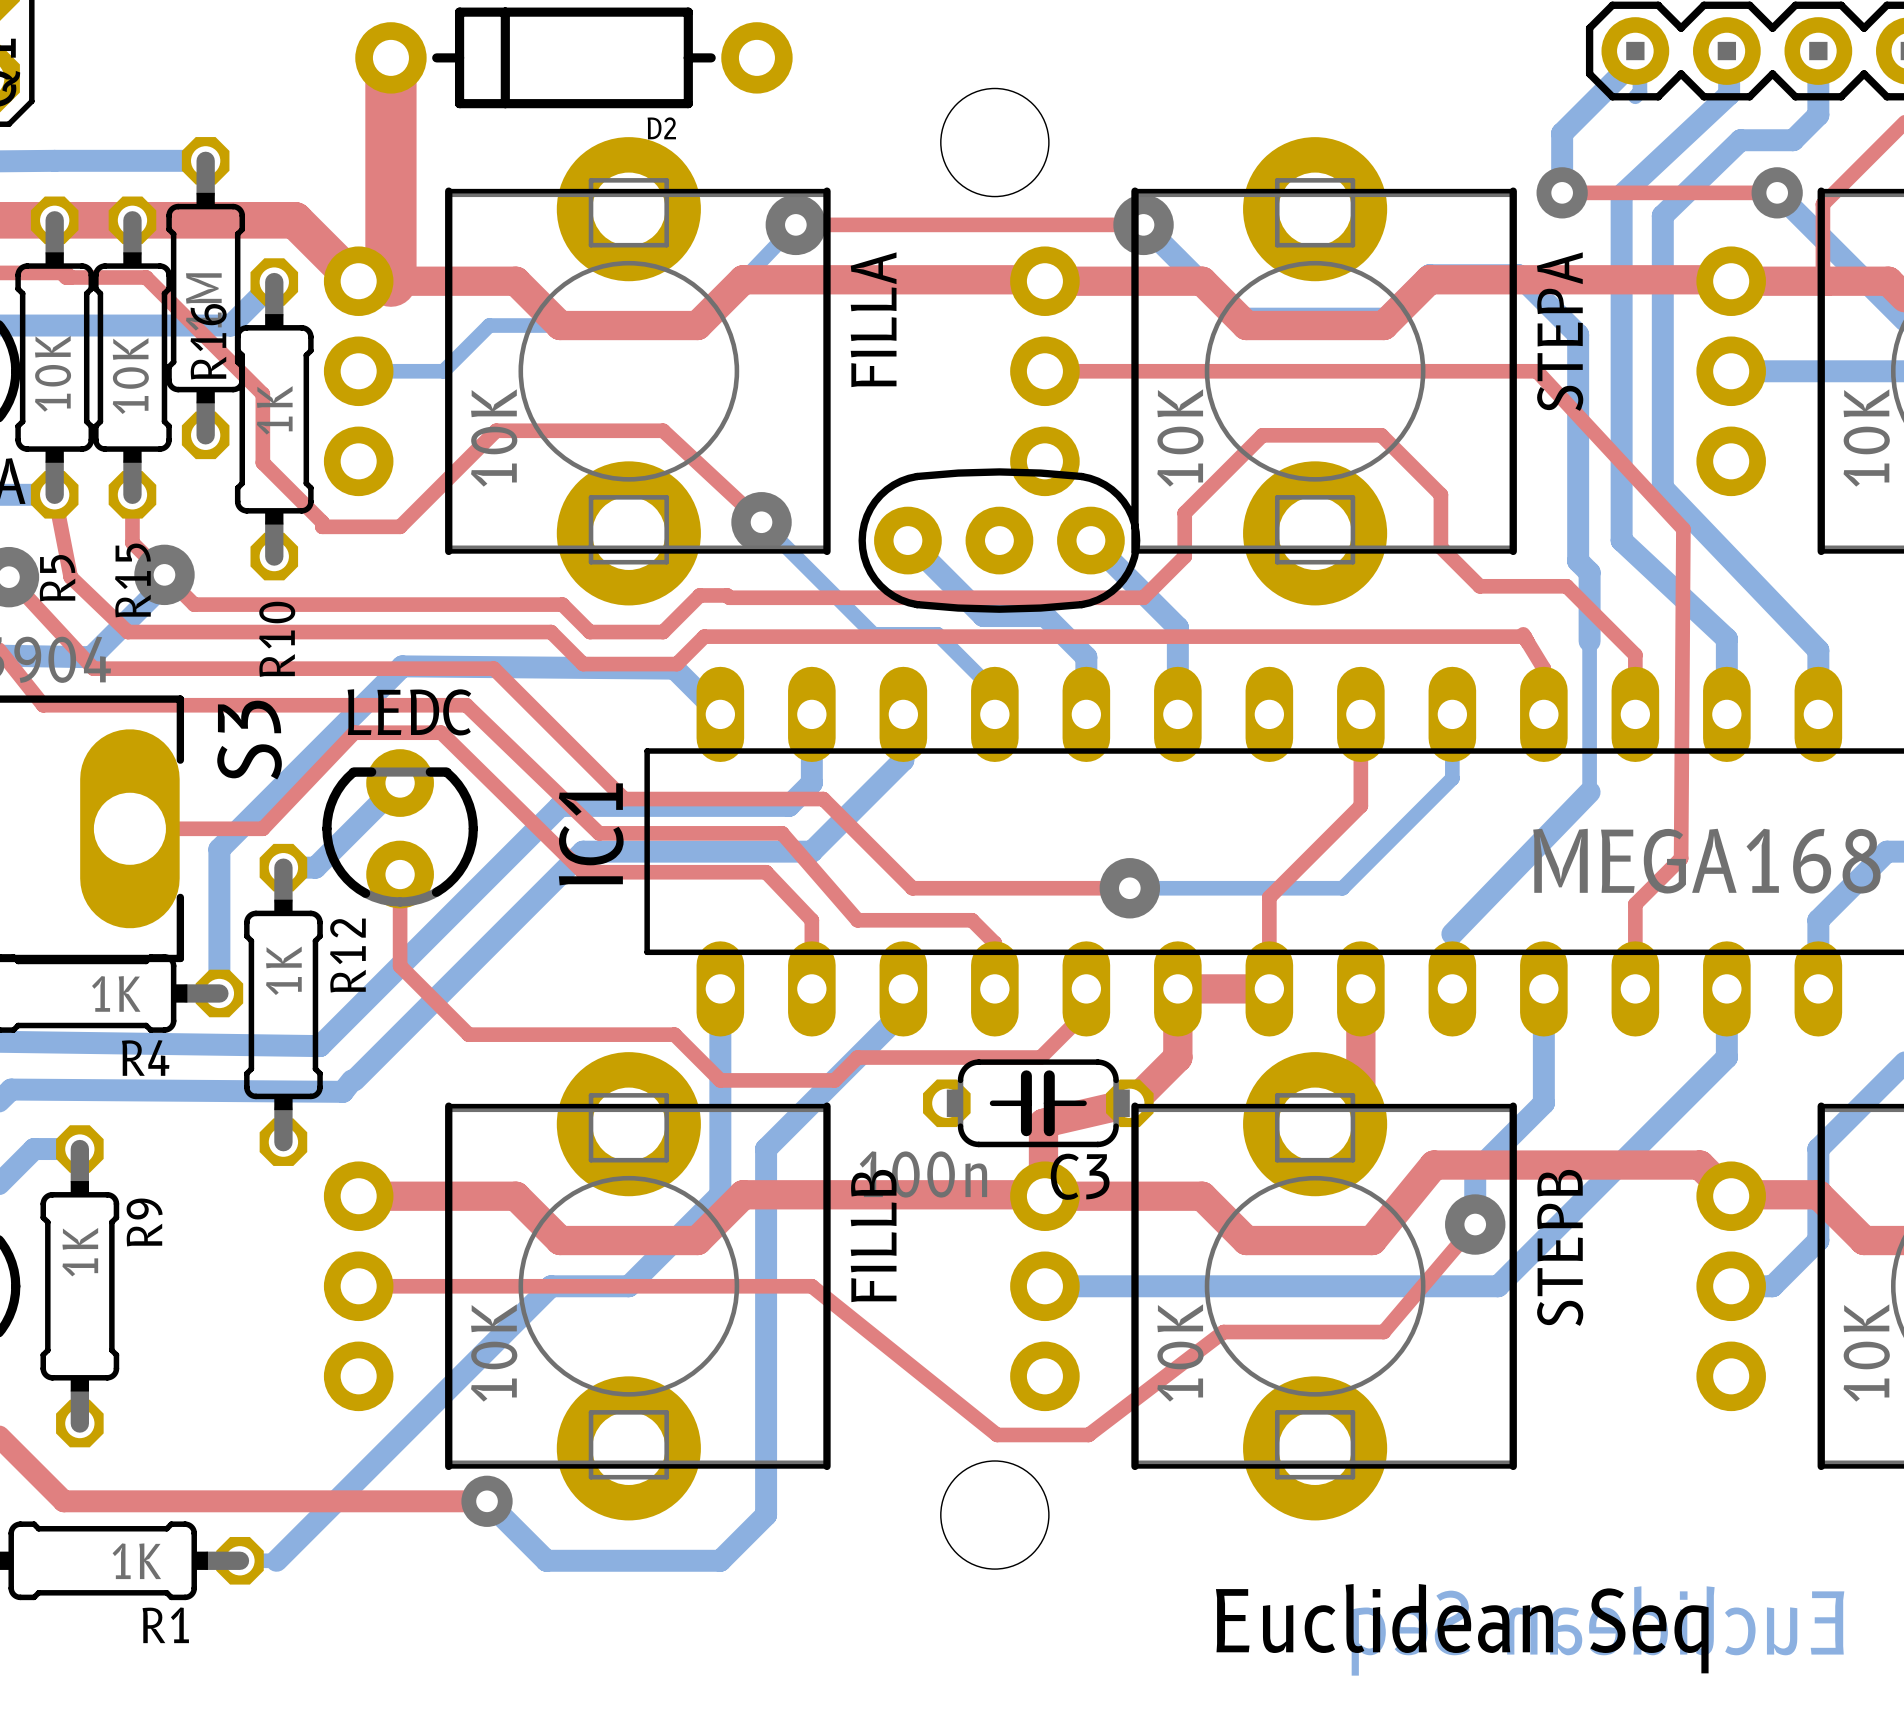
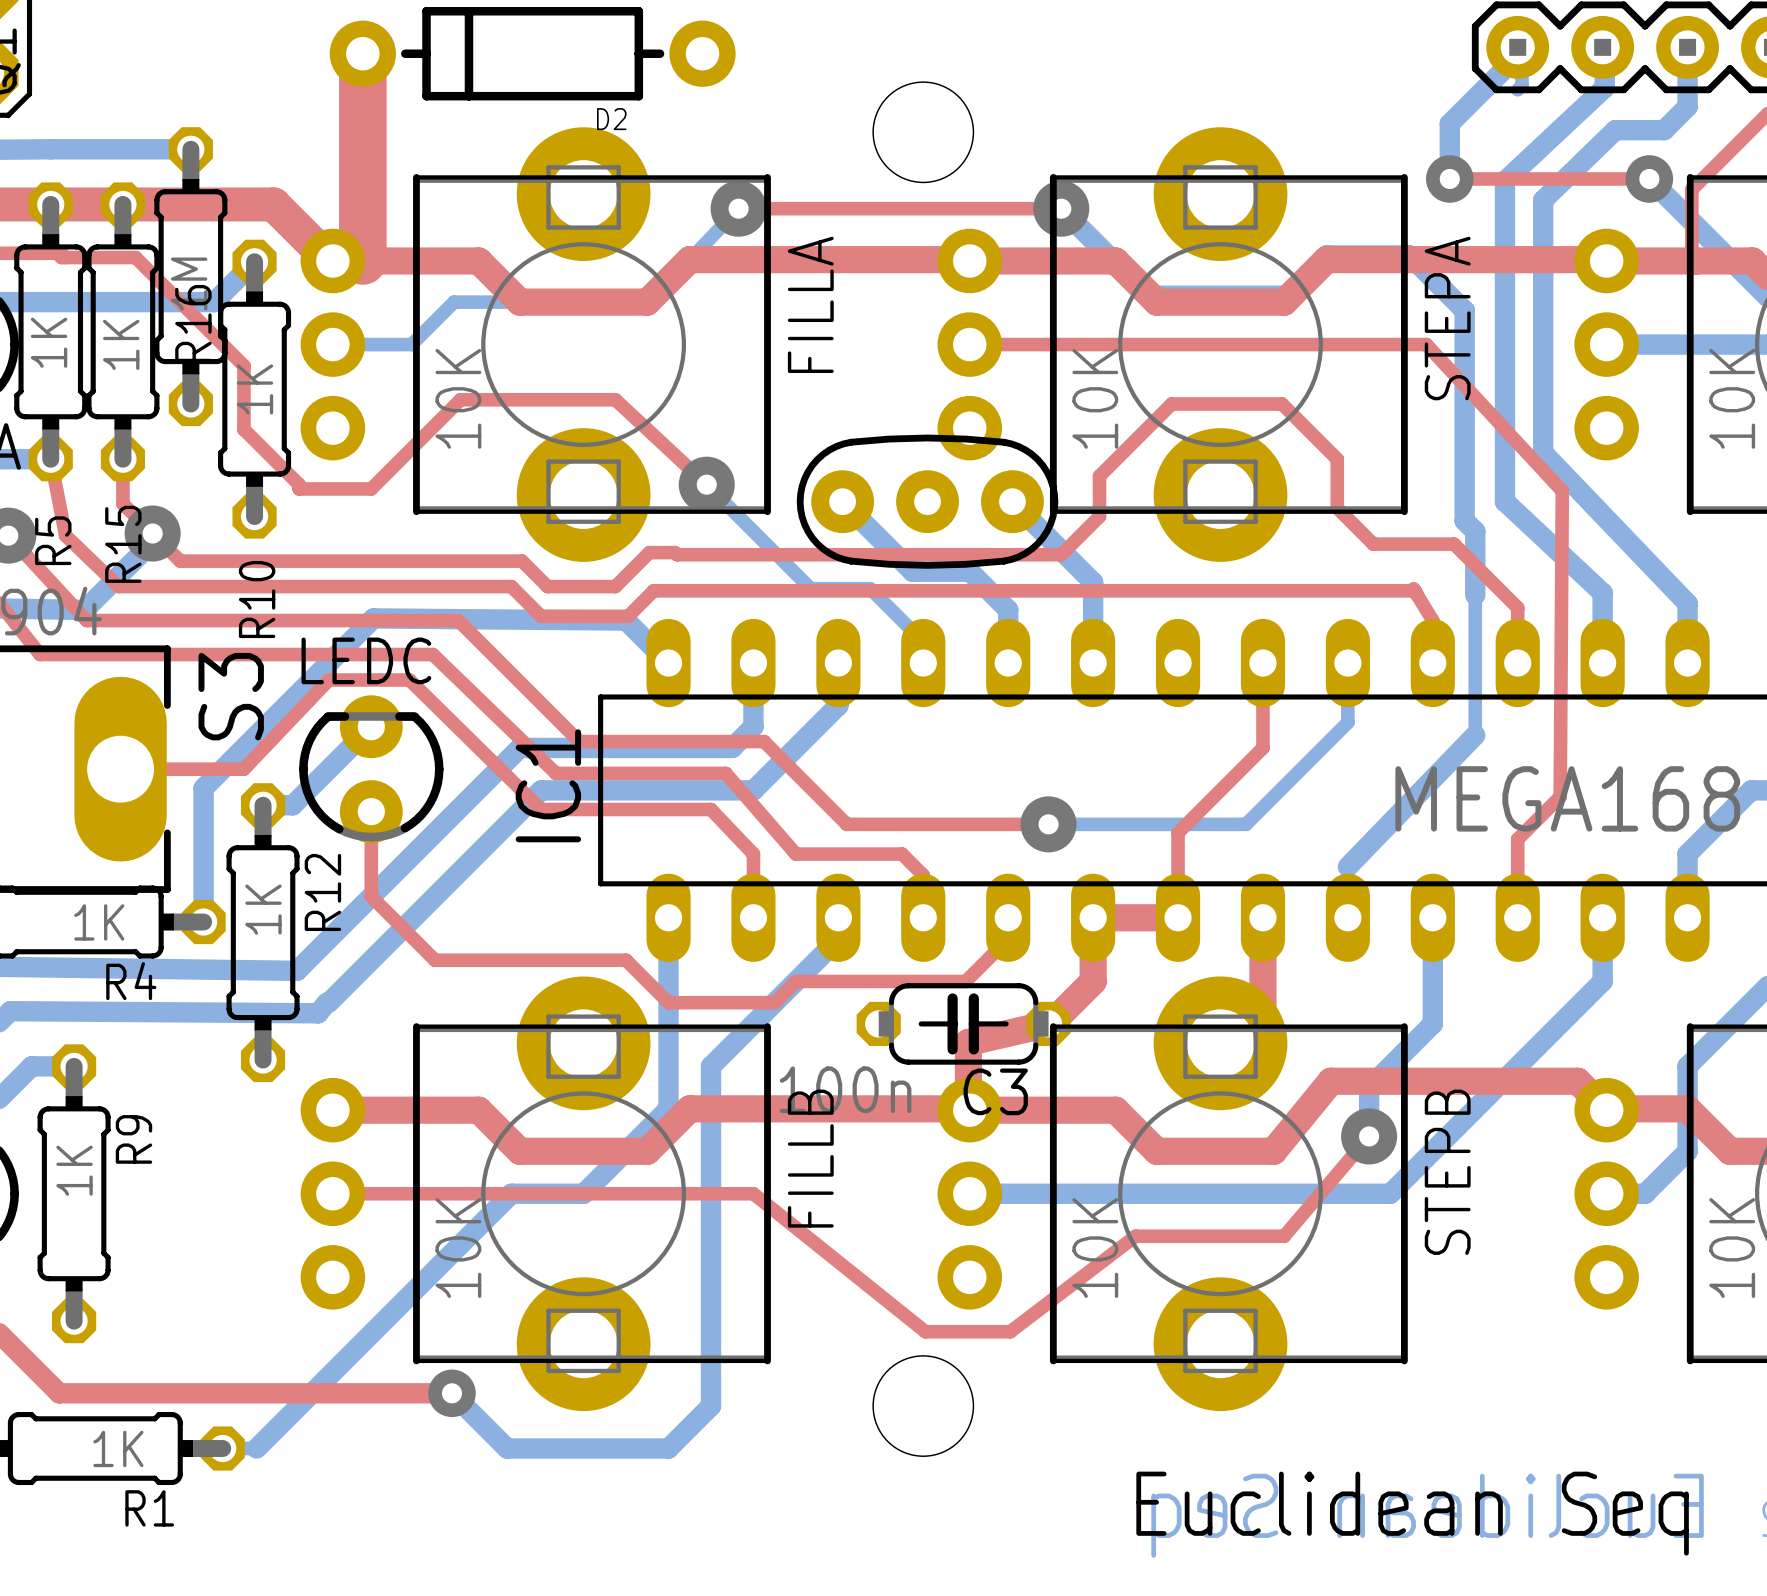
R5 value: 10K (53, 373) -> 1K (49, 342)
R15 value: 10K (130, 376) -> 1K (121, 344)

